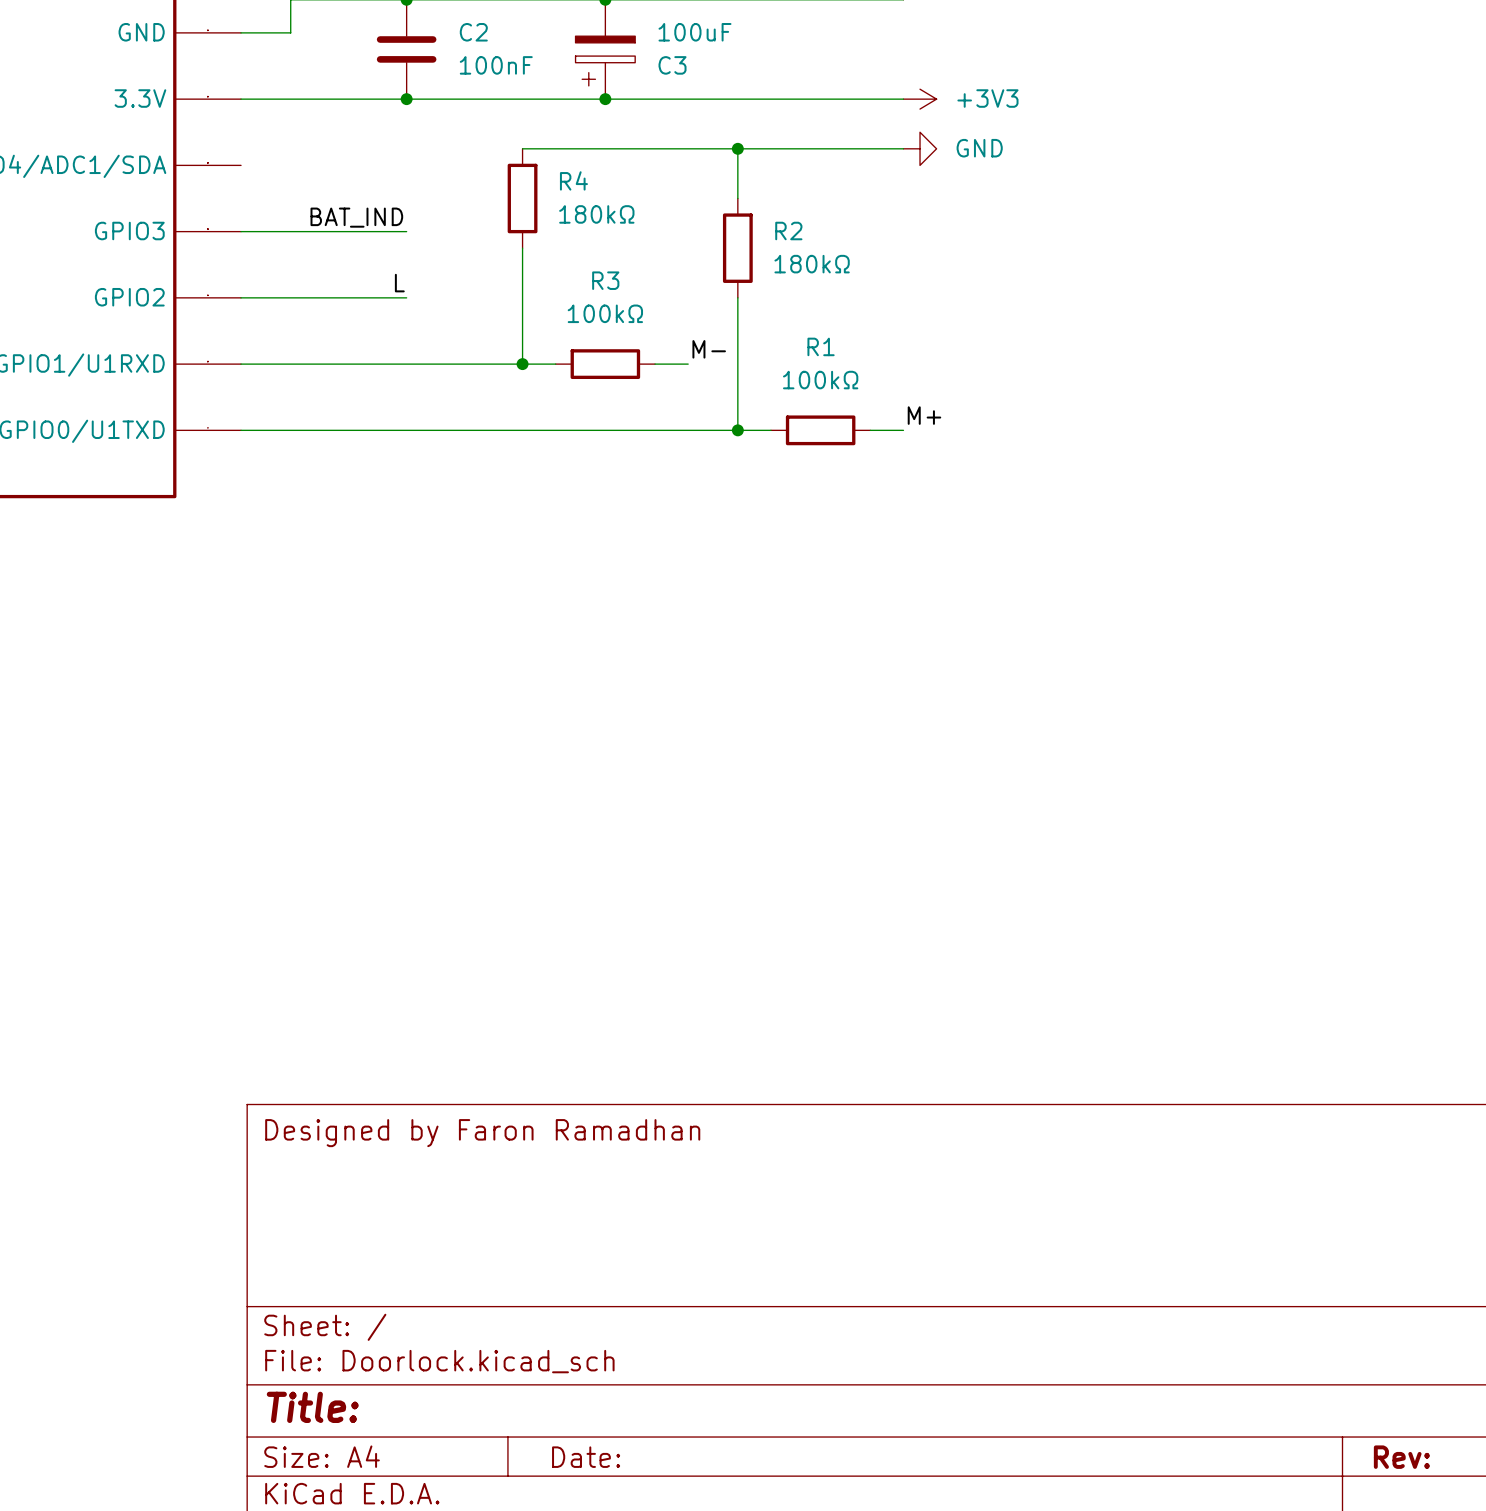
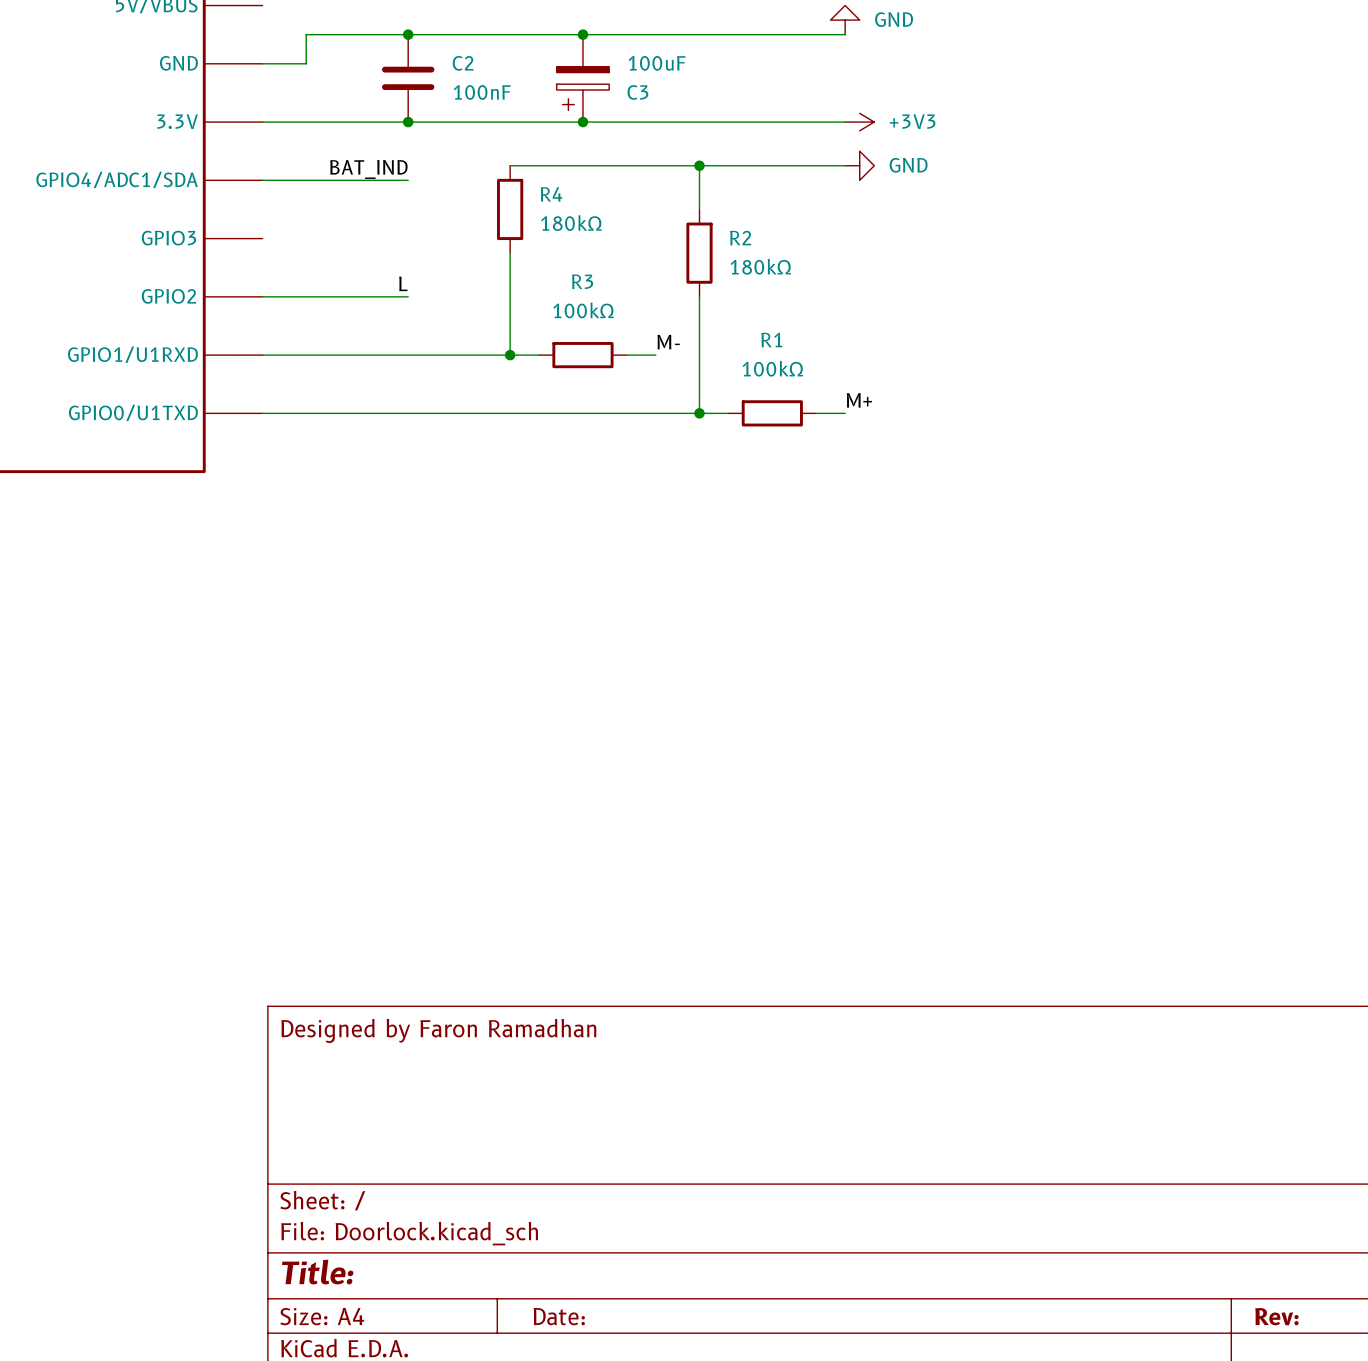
label position: BAT_IND (356, 217) -> BAT_IND (368, 169)
wire: (241, 231) (406, 231) -> (262, 180) (408, 180)

